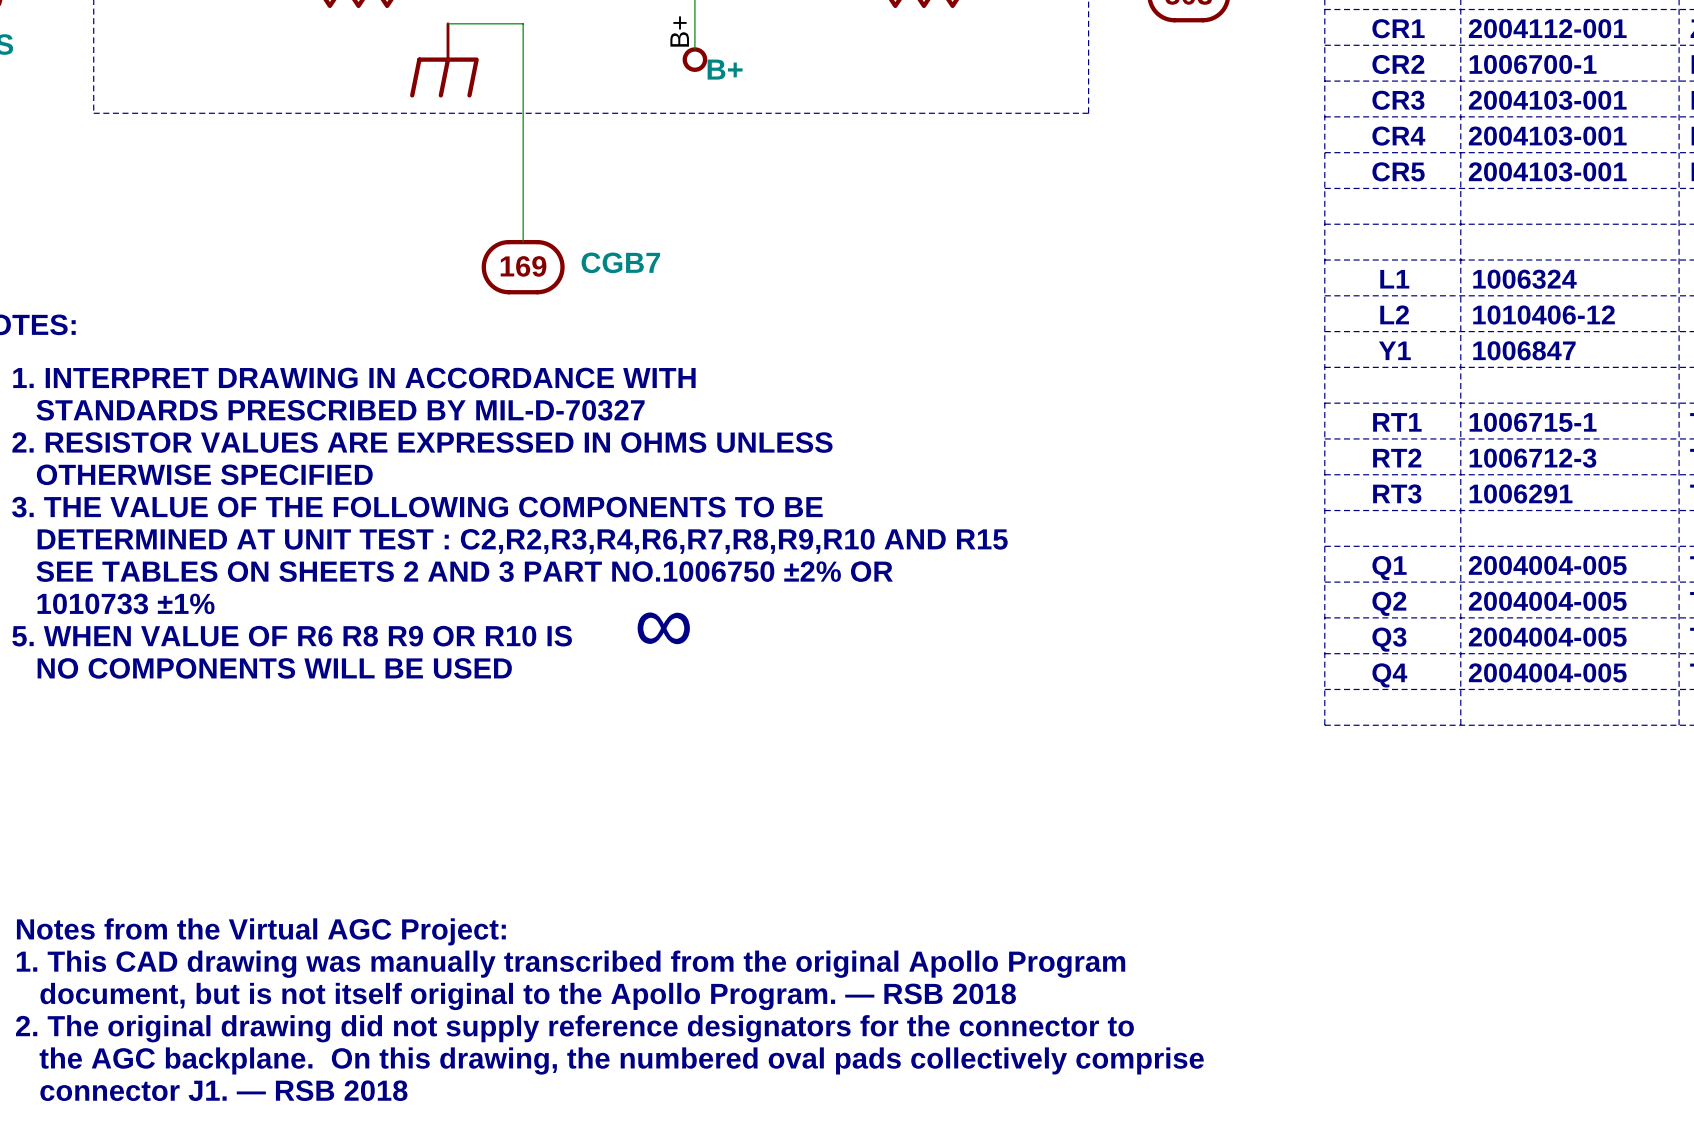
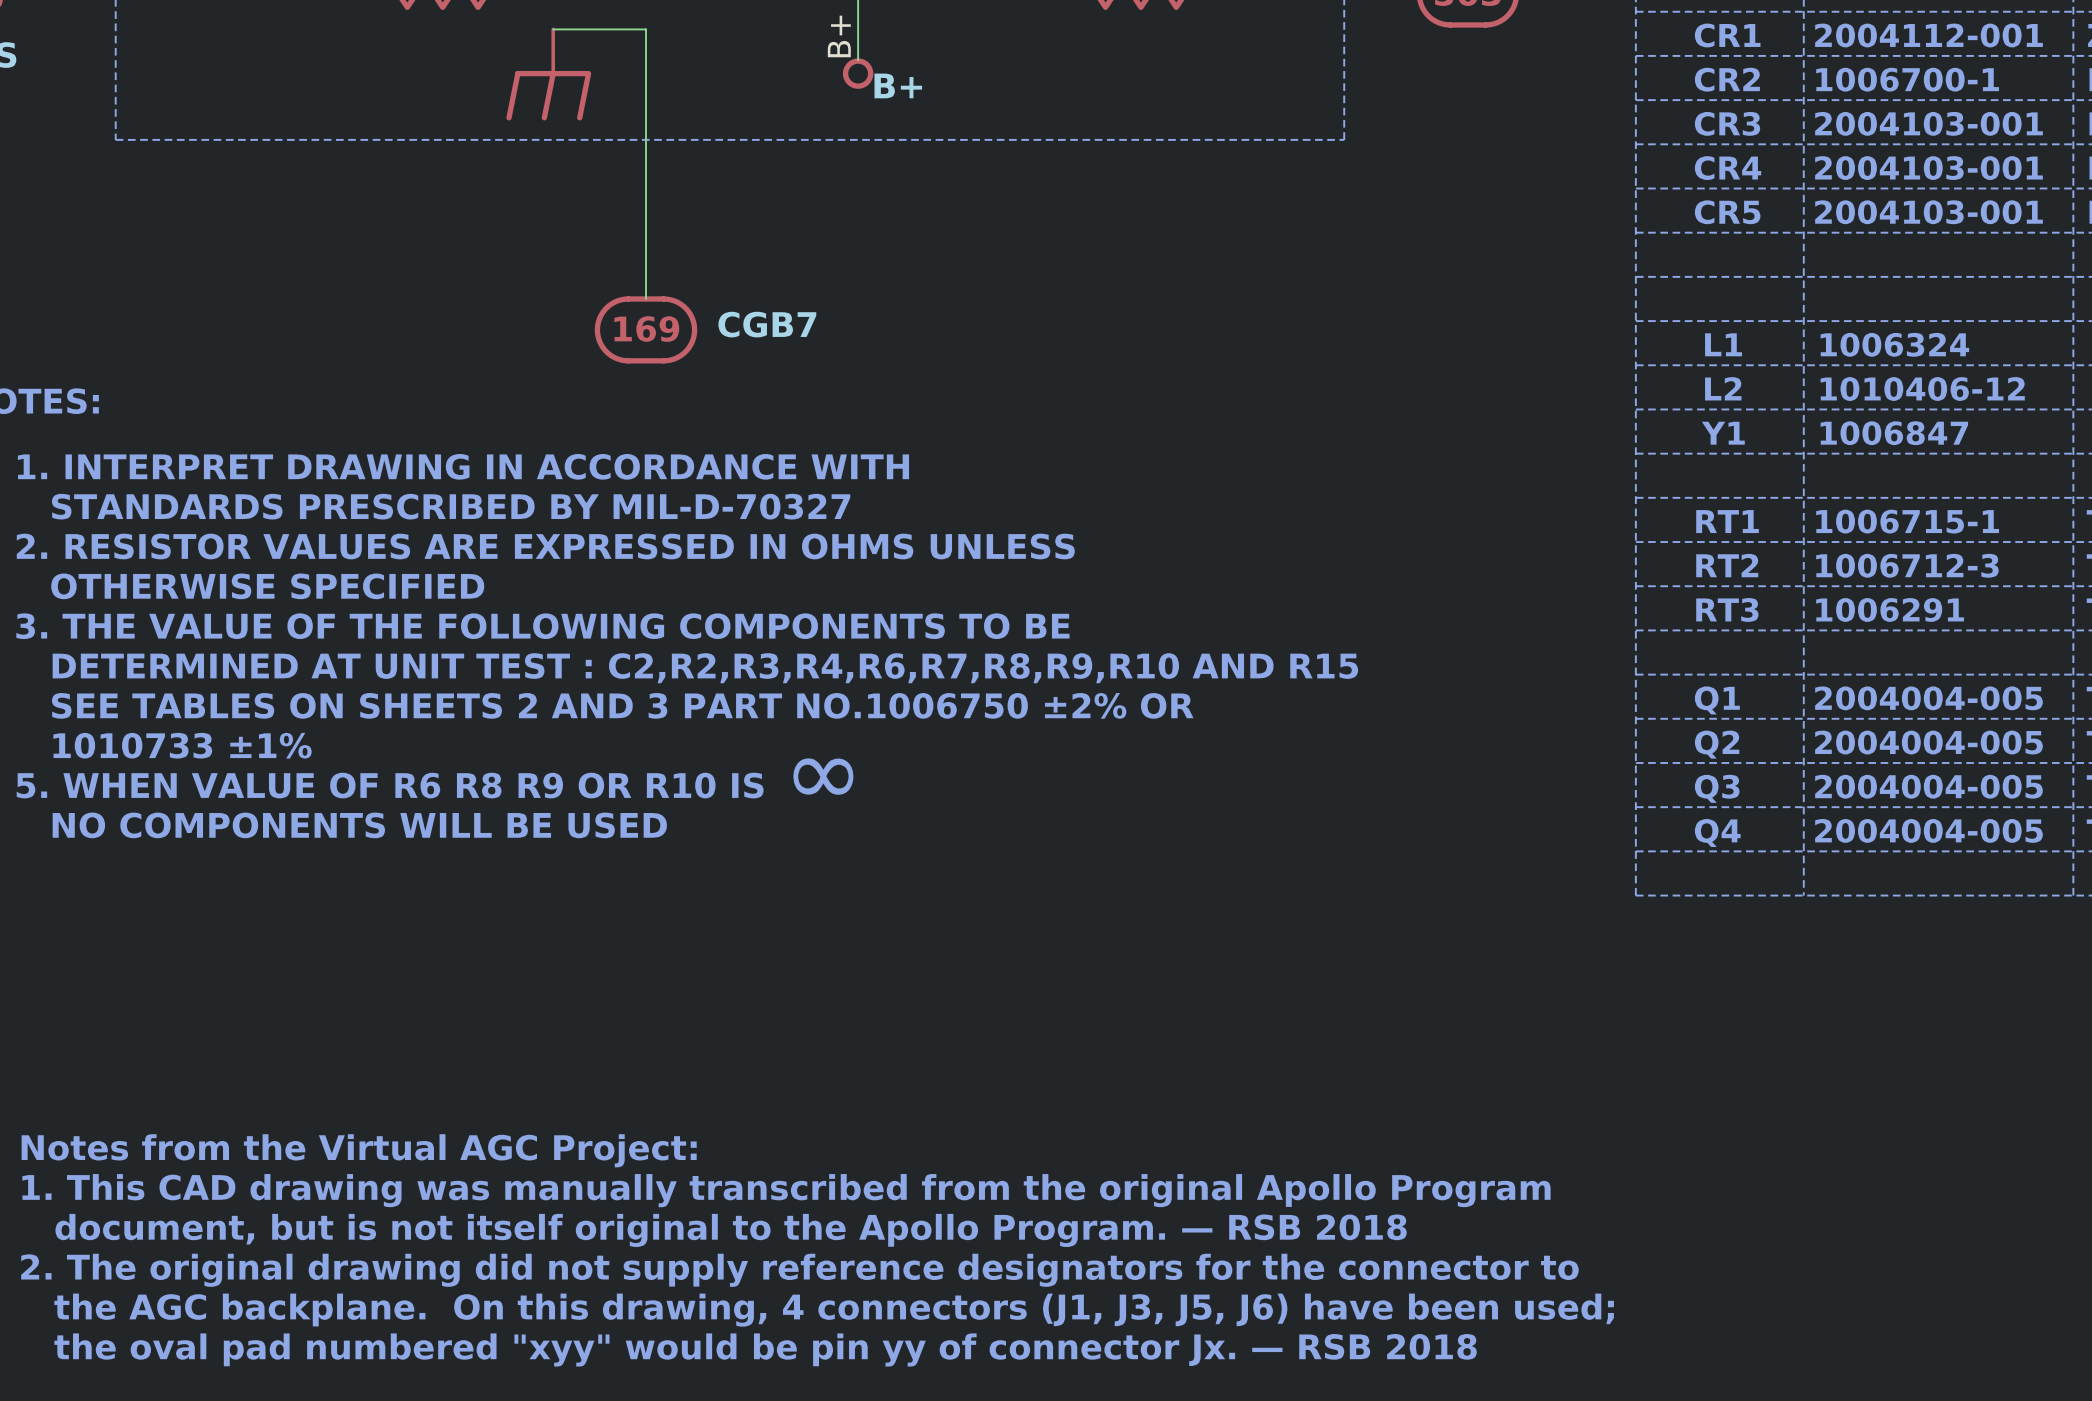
text: the AGC backplane. On this drawing, the numbered oval pads collectively comprise (621, 1061) -> the AGC backplane. On this drawing, 4 connectors (J1, J3, J5, J6) have been used; (834, 1310)
text: connector J1. — RSB 2018 (223, 1090) -> the oval pad numbered "xyy" would be pin yy of connector Jx. — RSB 2018 (765, 1349)

